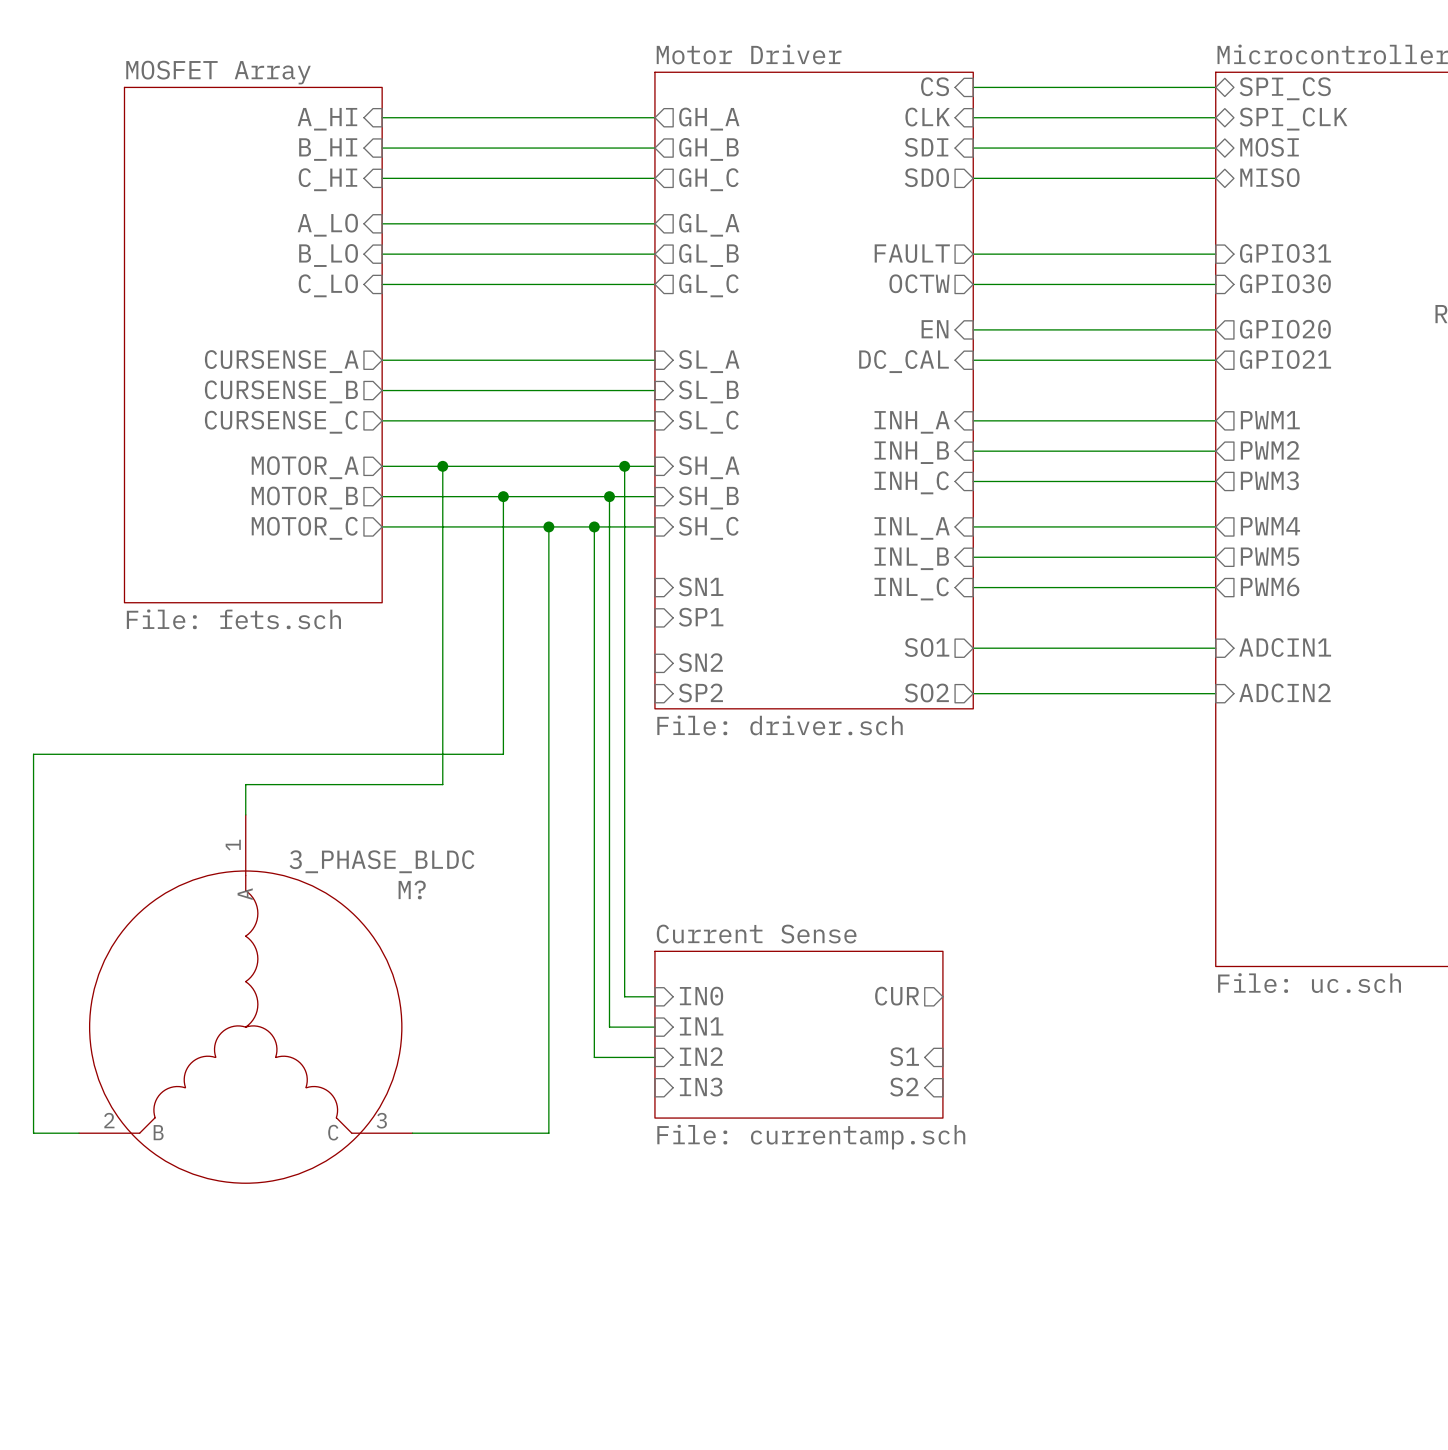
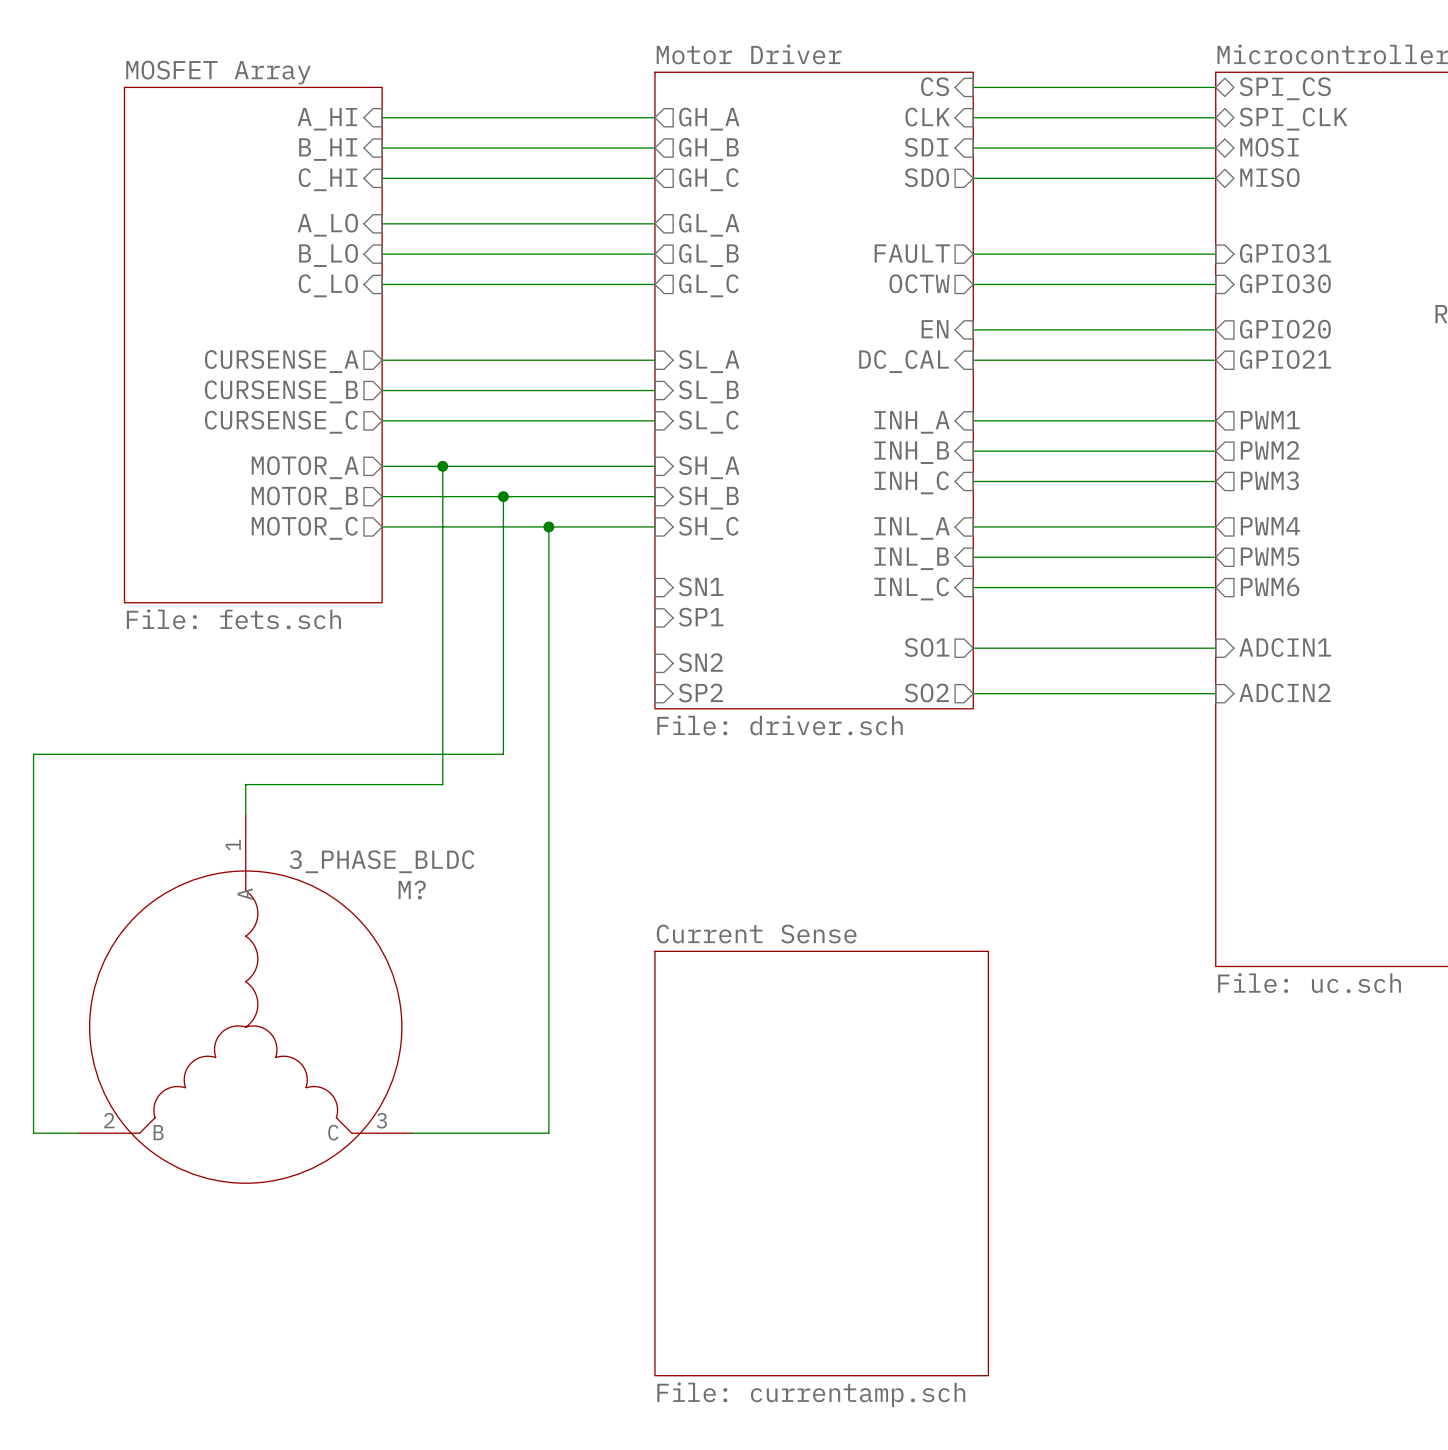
wire: (624, 466) (624, 996) (654, 996) -> none
junction: (624, 466) -> none
wire: (609, 496) (609, 1027) (654, 1027) -> none
junction: (609, 496) -> none
wire: (594, 526) (594, 1057) (654, 1057) -> none
junction: (594, 526) -> none
sheet pin: IN0 (701, 996) -> none
sheet pin: CUR (896, 996) -> none
sheet pin: IN1 (701, 1026) -> none
sheet Current Sense: File: currentamp.sch (798, 1034) -> none
sheet pin: IN2 (701, 1056) -> none
sheet pin: S1 (904, 1056) -> none
sheet pin: IN3 (701, 1087) -> none
sheet pin: S2 (904, 1087) -> none
sheet Current Sense: none -> File: currentamp.sch (821, 1163)

